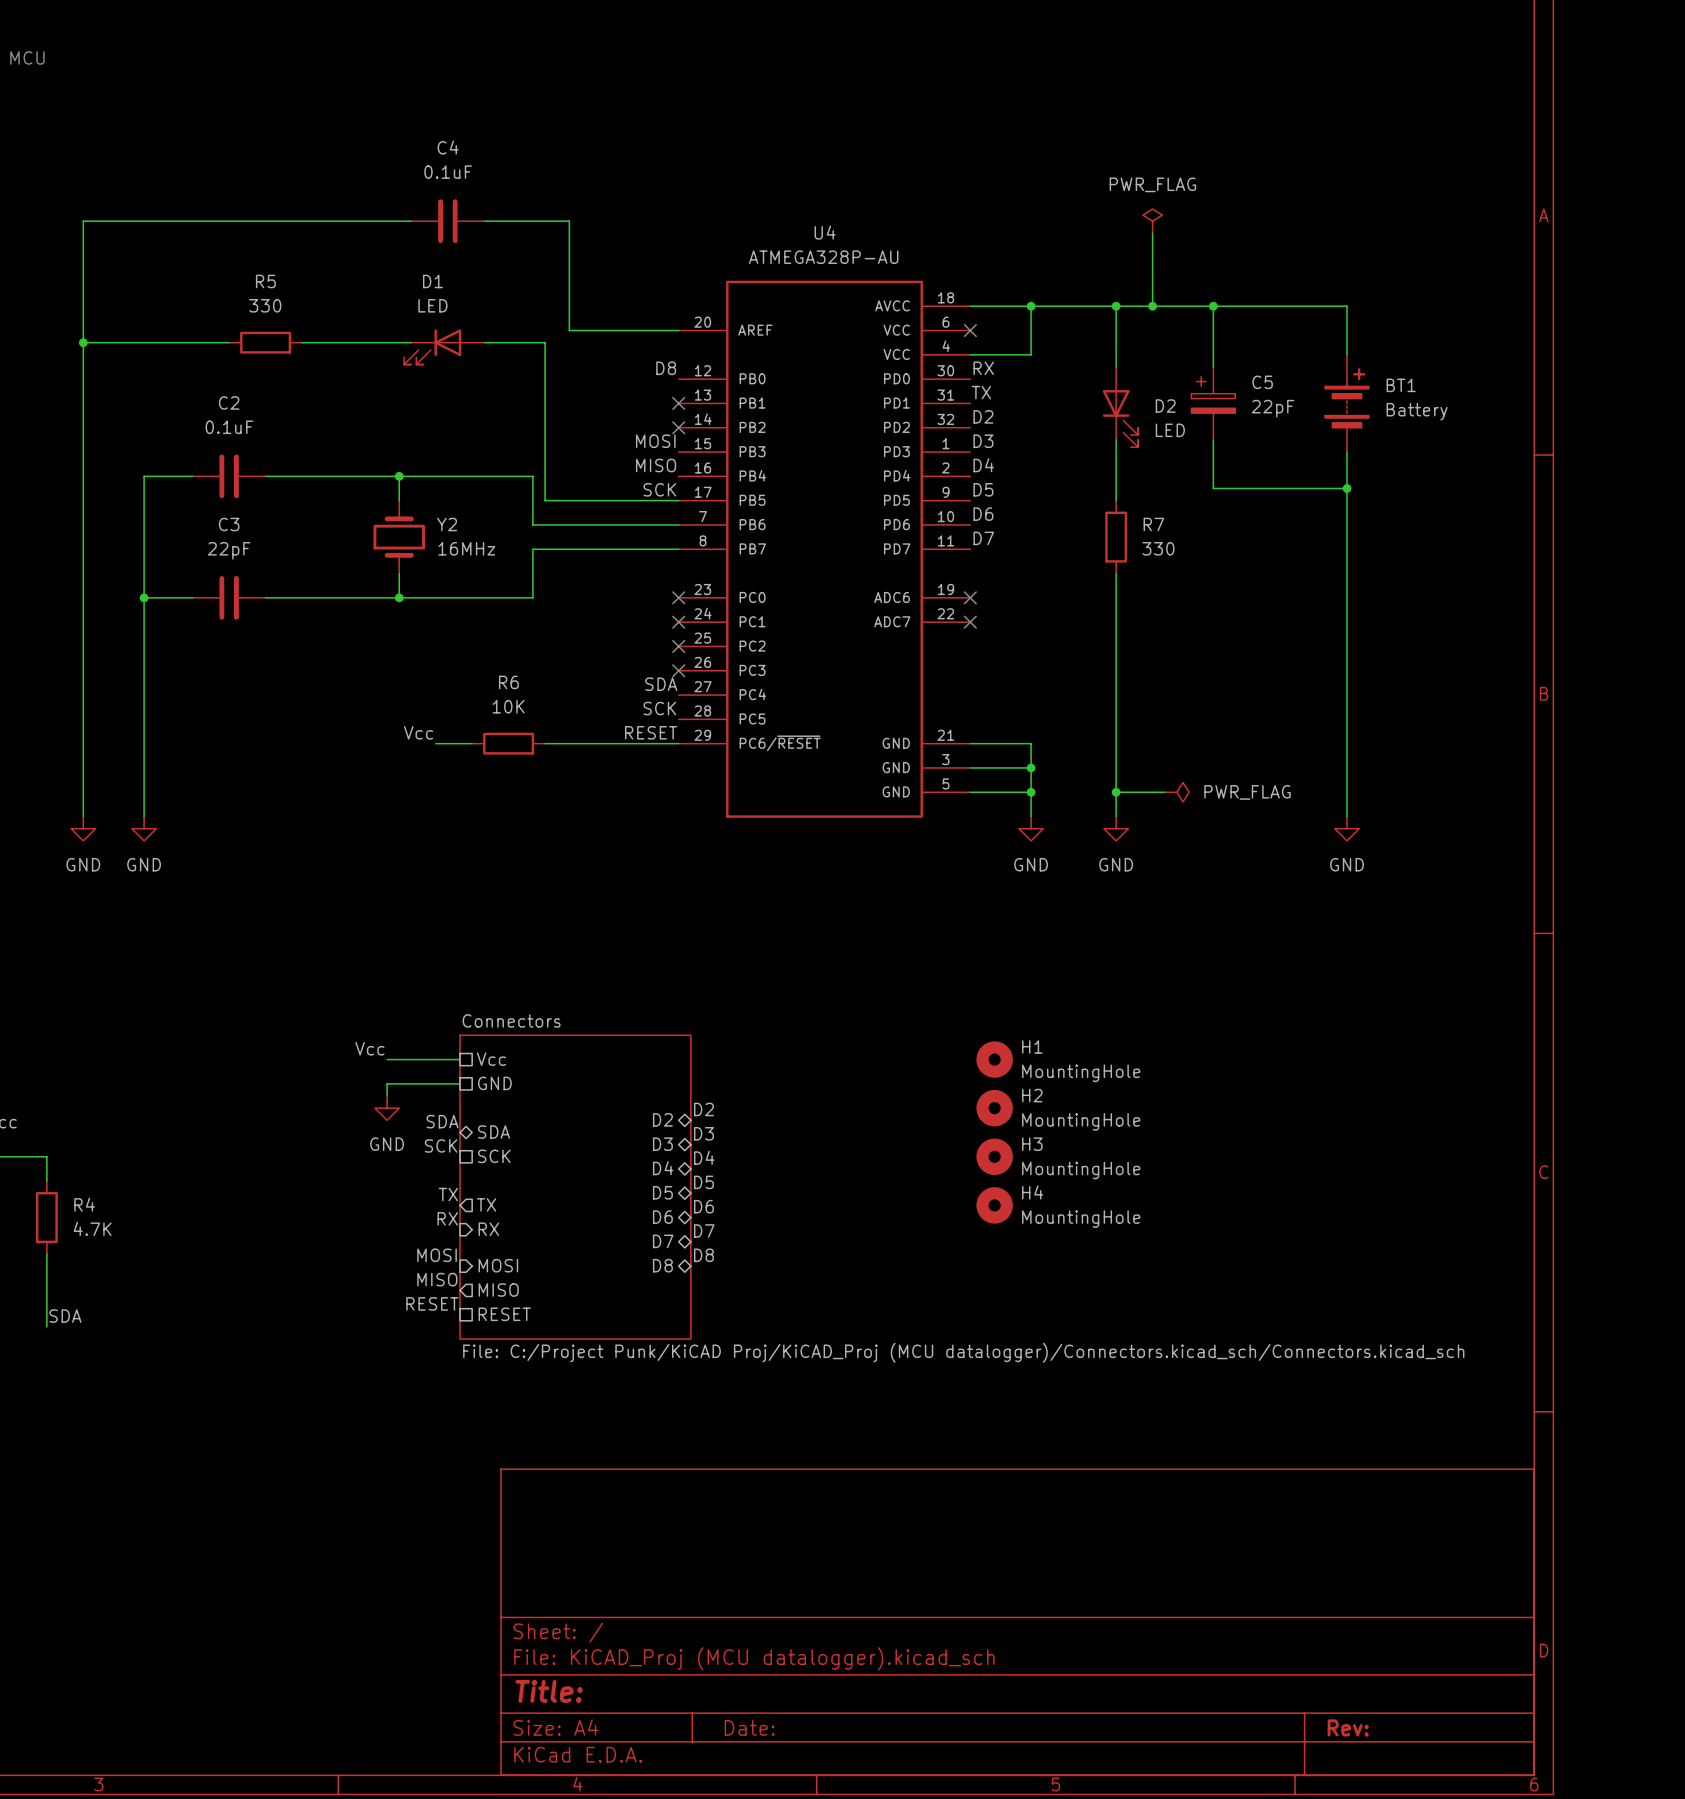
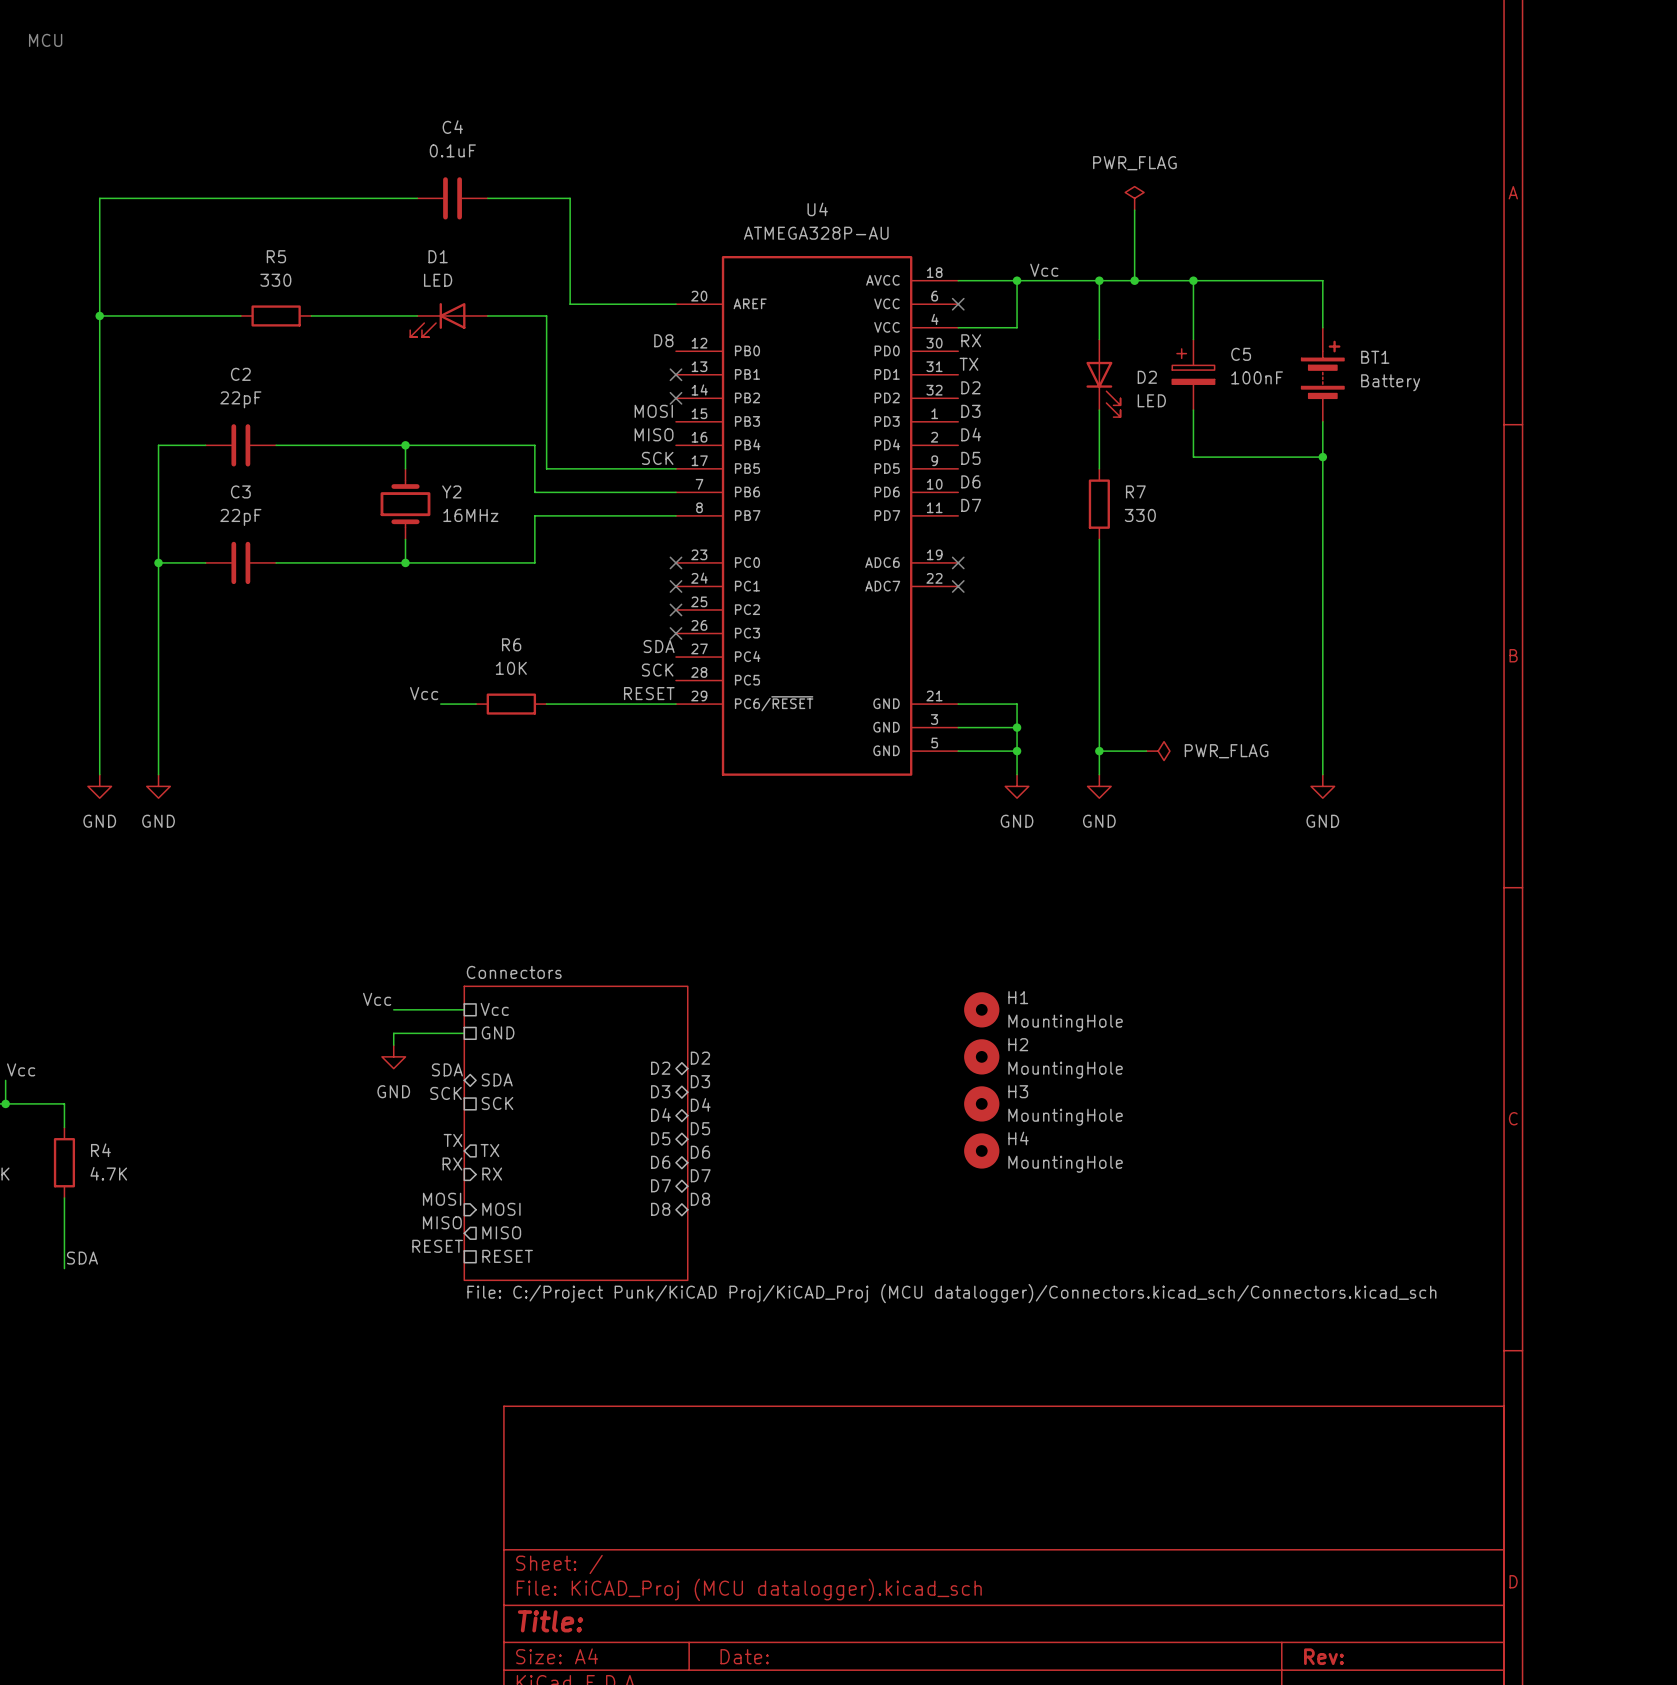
label: none -> Vcc (1044, 270)
C5 value: 22pF (1273, 408) -> 100nF (1257, 377)
C2 value: 0.1uF (229, 427) -> 22pF (240, 399)

